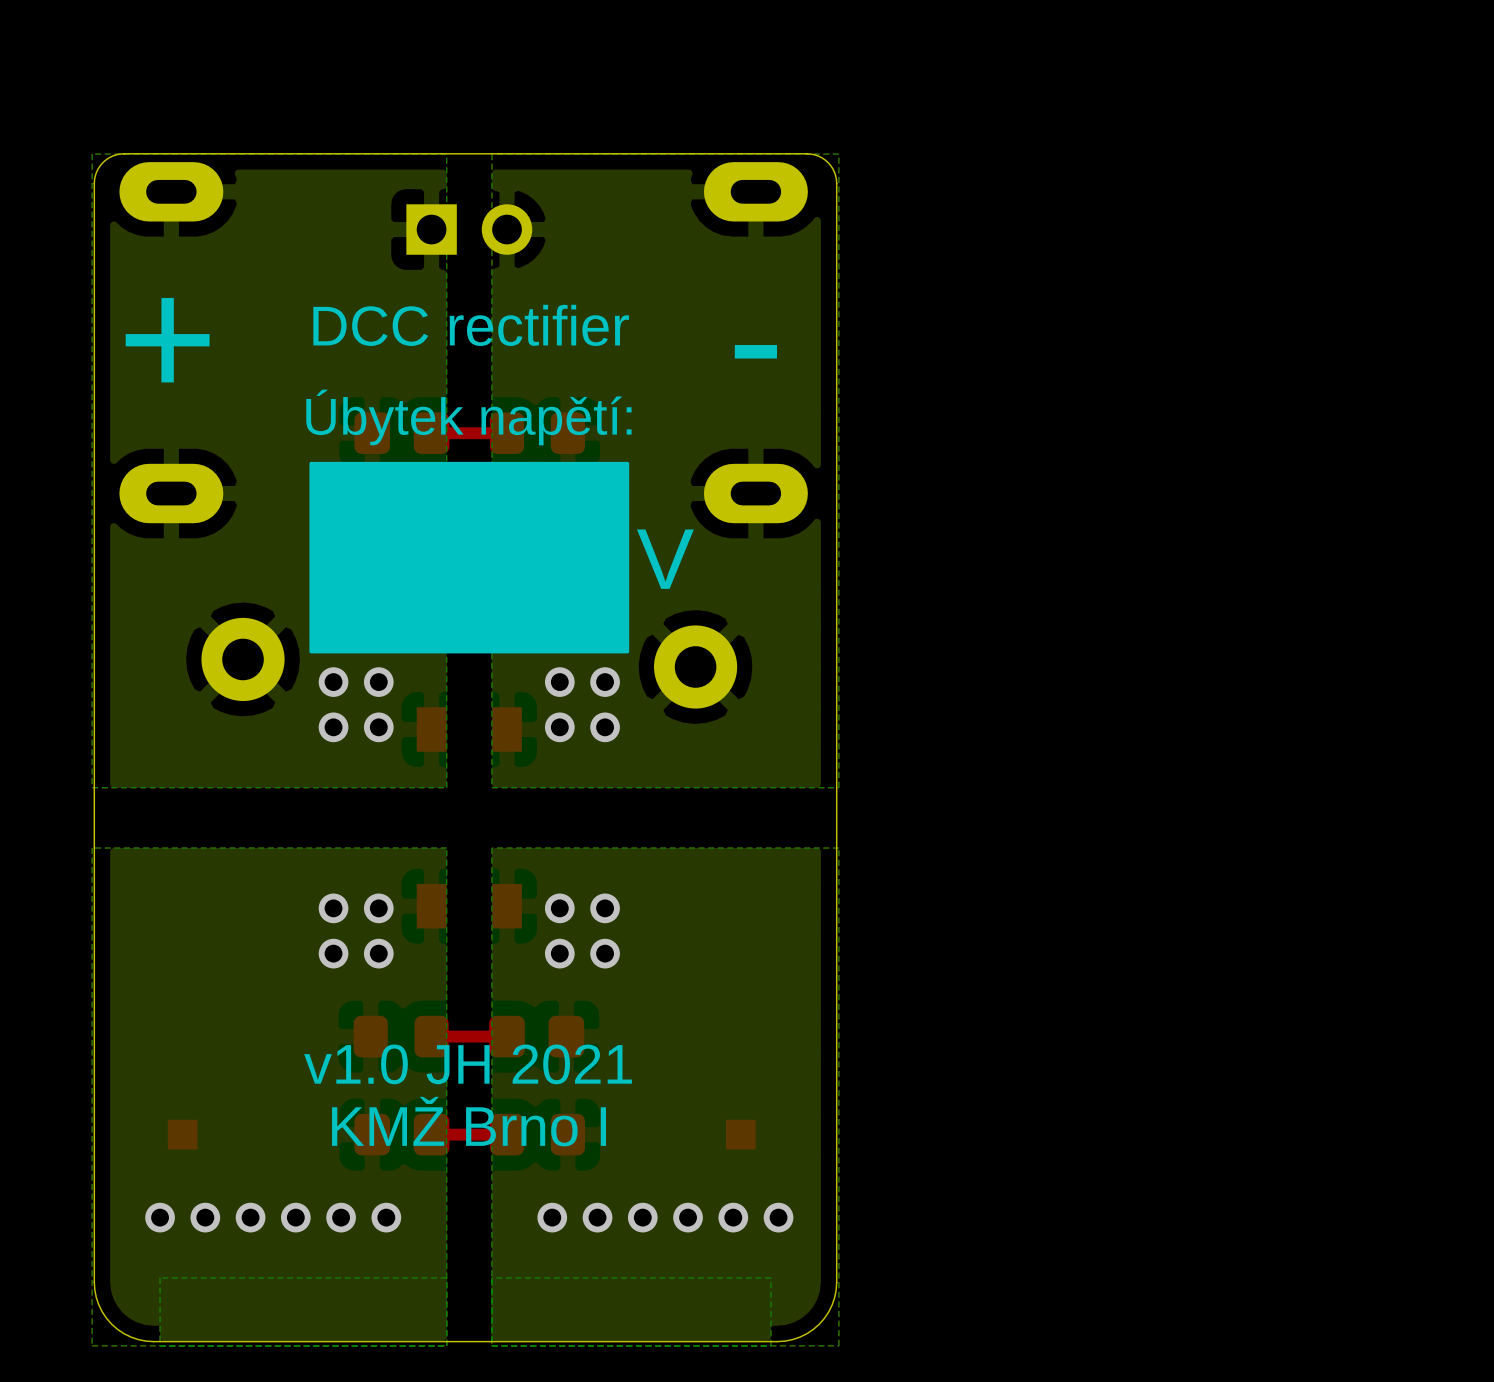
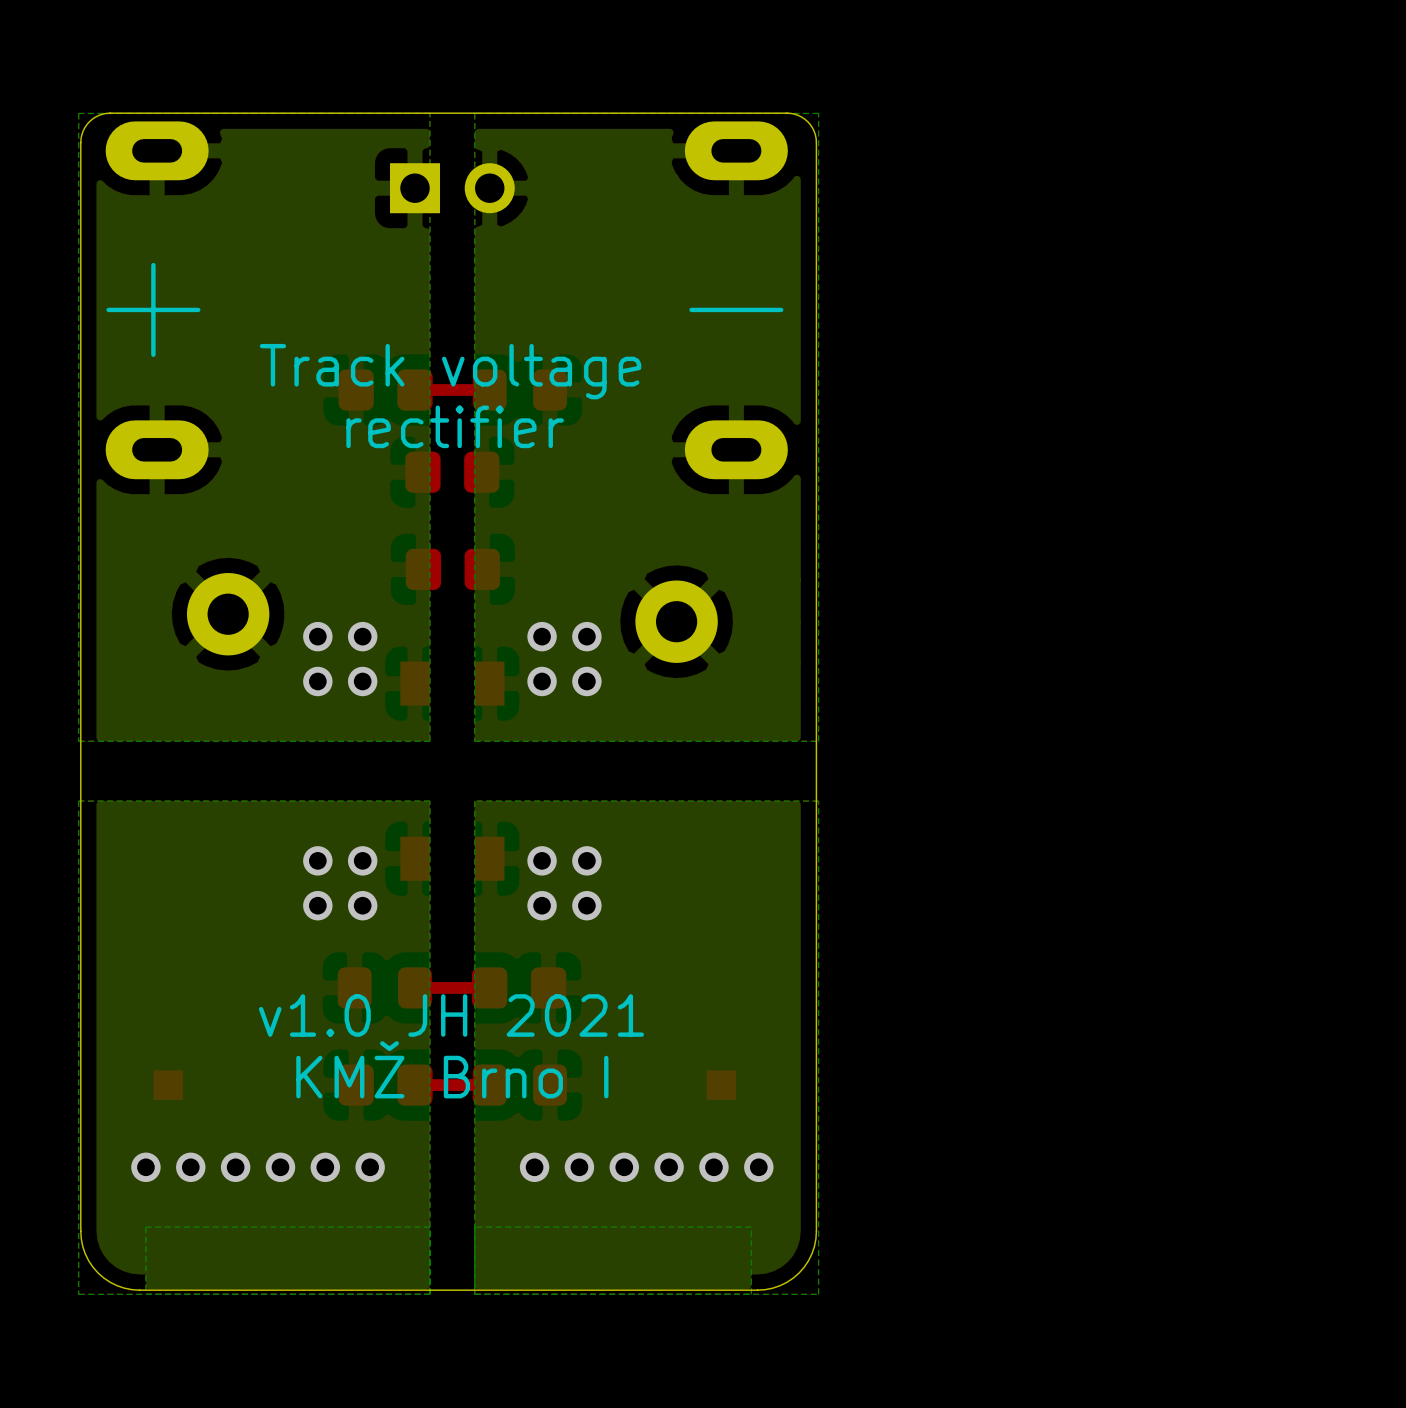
text: DCC rectifier (471, 325) -> none
text: Úbytek napětí: (468, 417) -> Track voltage (450, 371)
drawing: [309, 461, 630, 654] -> none
text: none -> rectifier (455, 426)
text: V (665, 559) -> none

